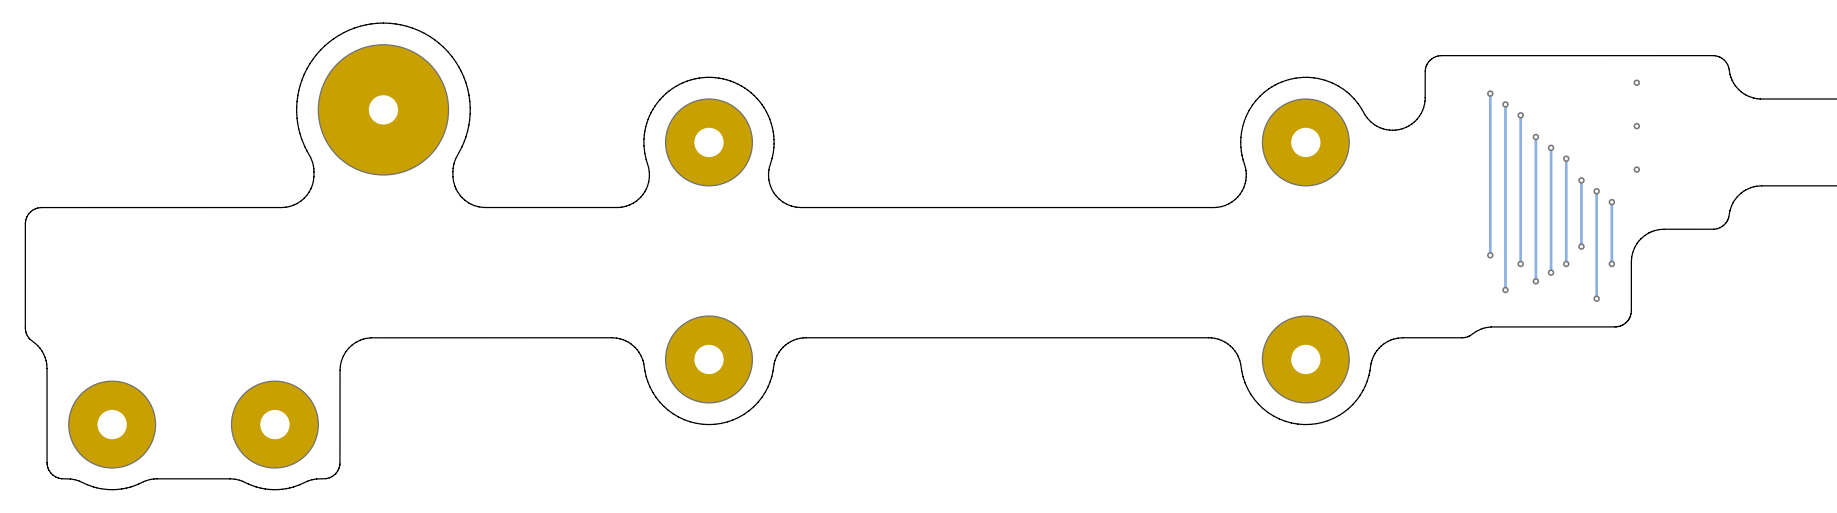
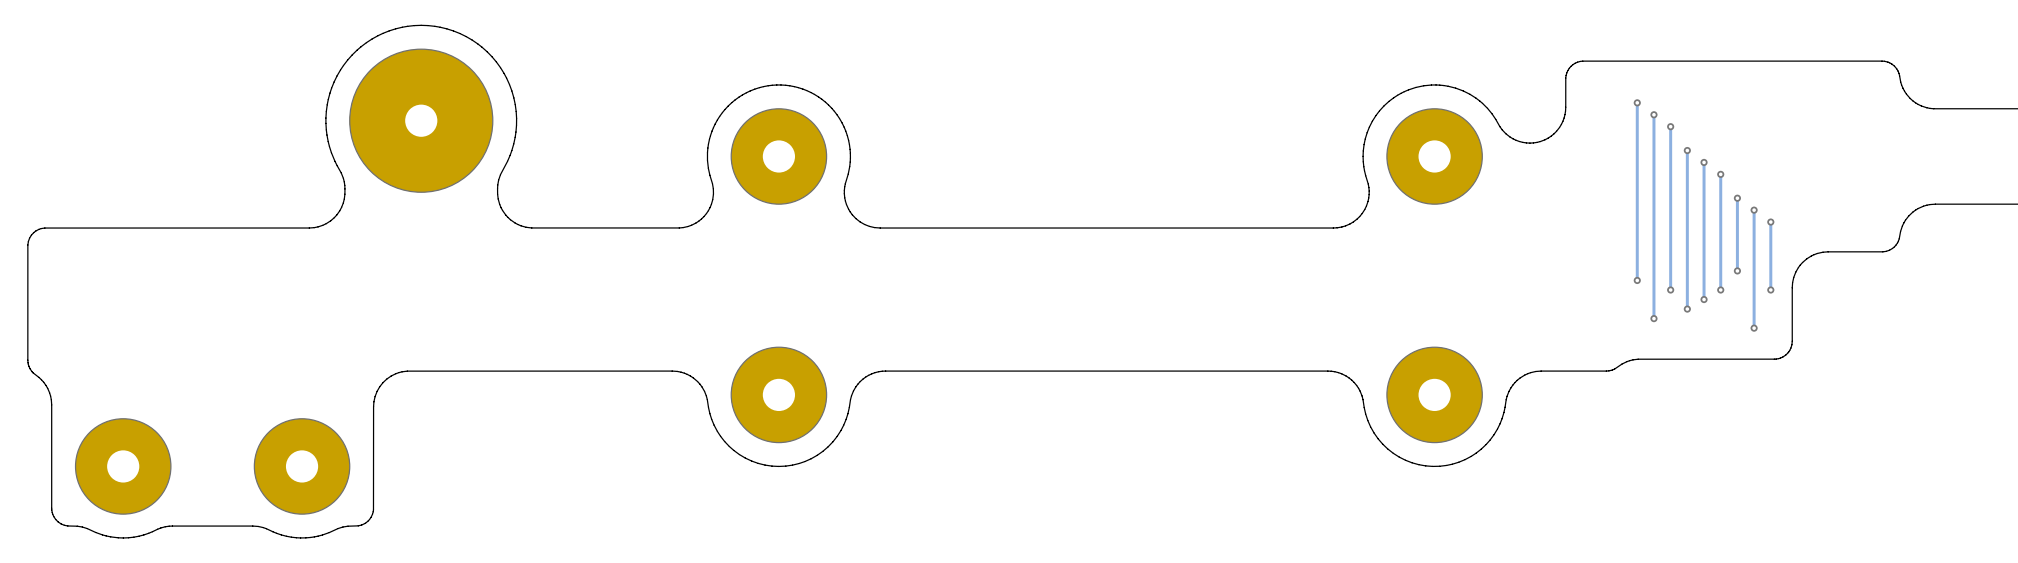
via: (1636, 82) -> none
via: (1636, 126) -> none
via: (1636, 169) -> none

